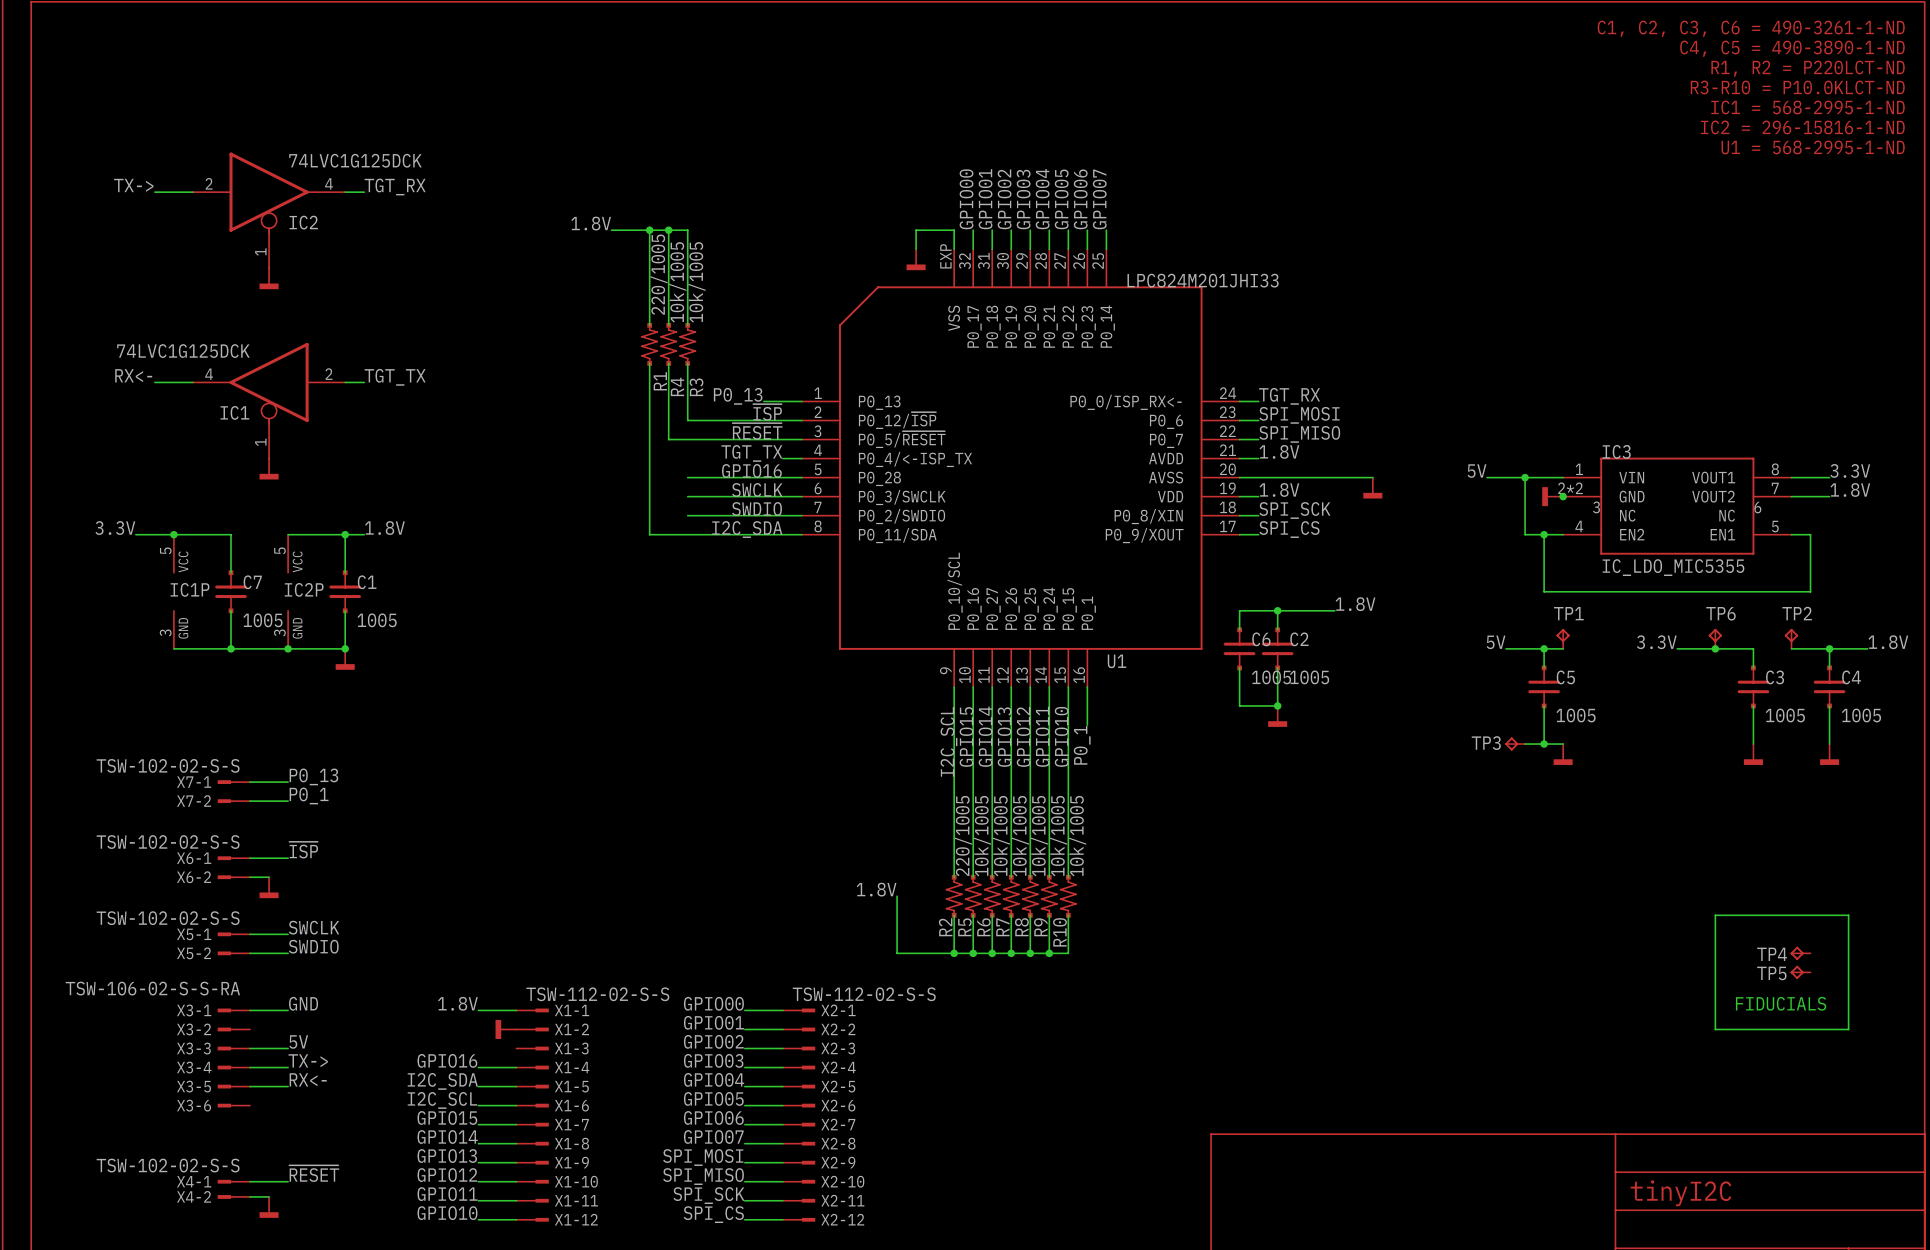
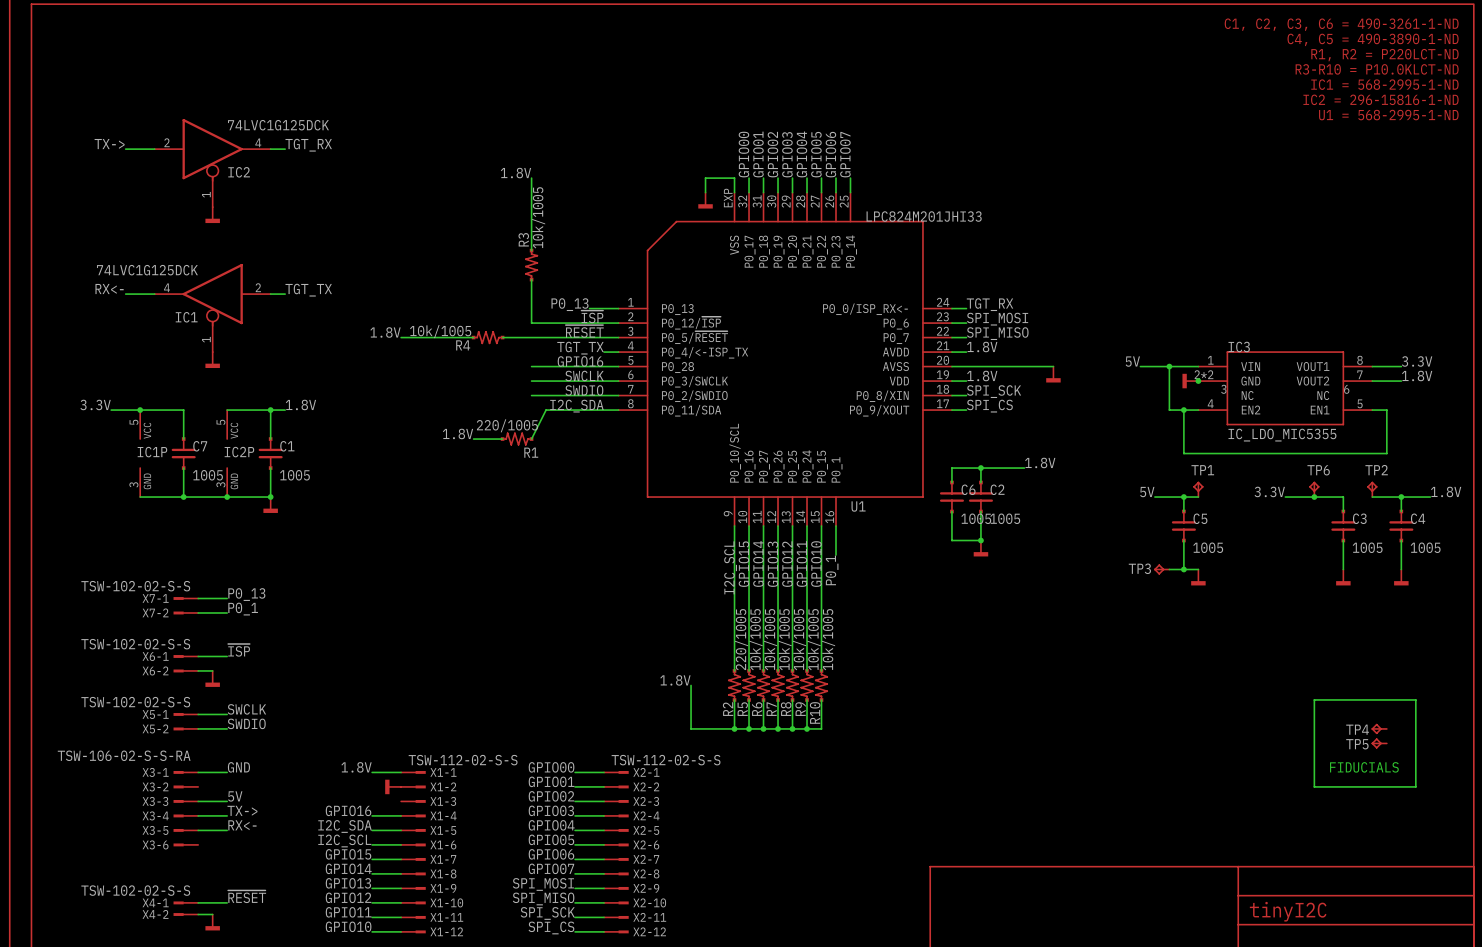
label position: 1.8V (591, 223) -> 1.8V (515, 173)
wire: (611, 230) (687, 230) -> none
wire: (649, 230) (649, 325) -> none
junction: (649, 230) -> none
wire: (668, 230) (668, 325) -> none
junction: (668, 230) -> none
R1 value position: 220/1005 (658, 274) -> 220/1005 (507, 425)
R1 rotation: 0° (649, 344) -> 90° counterclockwise (517, 439)
R1 position: (649, 344) -> (517, 439)
R4 rotation: 0° (668, 344) -> 90° counterclockwise (488, 337)
R4 position: (668, 344) -> (488, 337)
wire: (649, 363) (649, 534) (706, 534) -> (531, 439) (546, 410)
wire: (668, 363) (668, 439) -> (502, 337) (517, 337)
R4 name position: R4 (677, 386) -> R4 (463, 345)
R3 name position: R3 (696, 387) -> R3 (523, 239)
label: none -> 1.8V (385, 332)
wire: none -> (401, 337) (473, 337)
label: none -> 1.8V (458, 433)
wire: none -> (473, 439) (502, 439)

